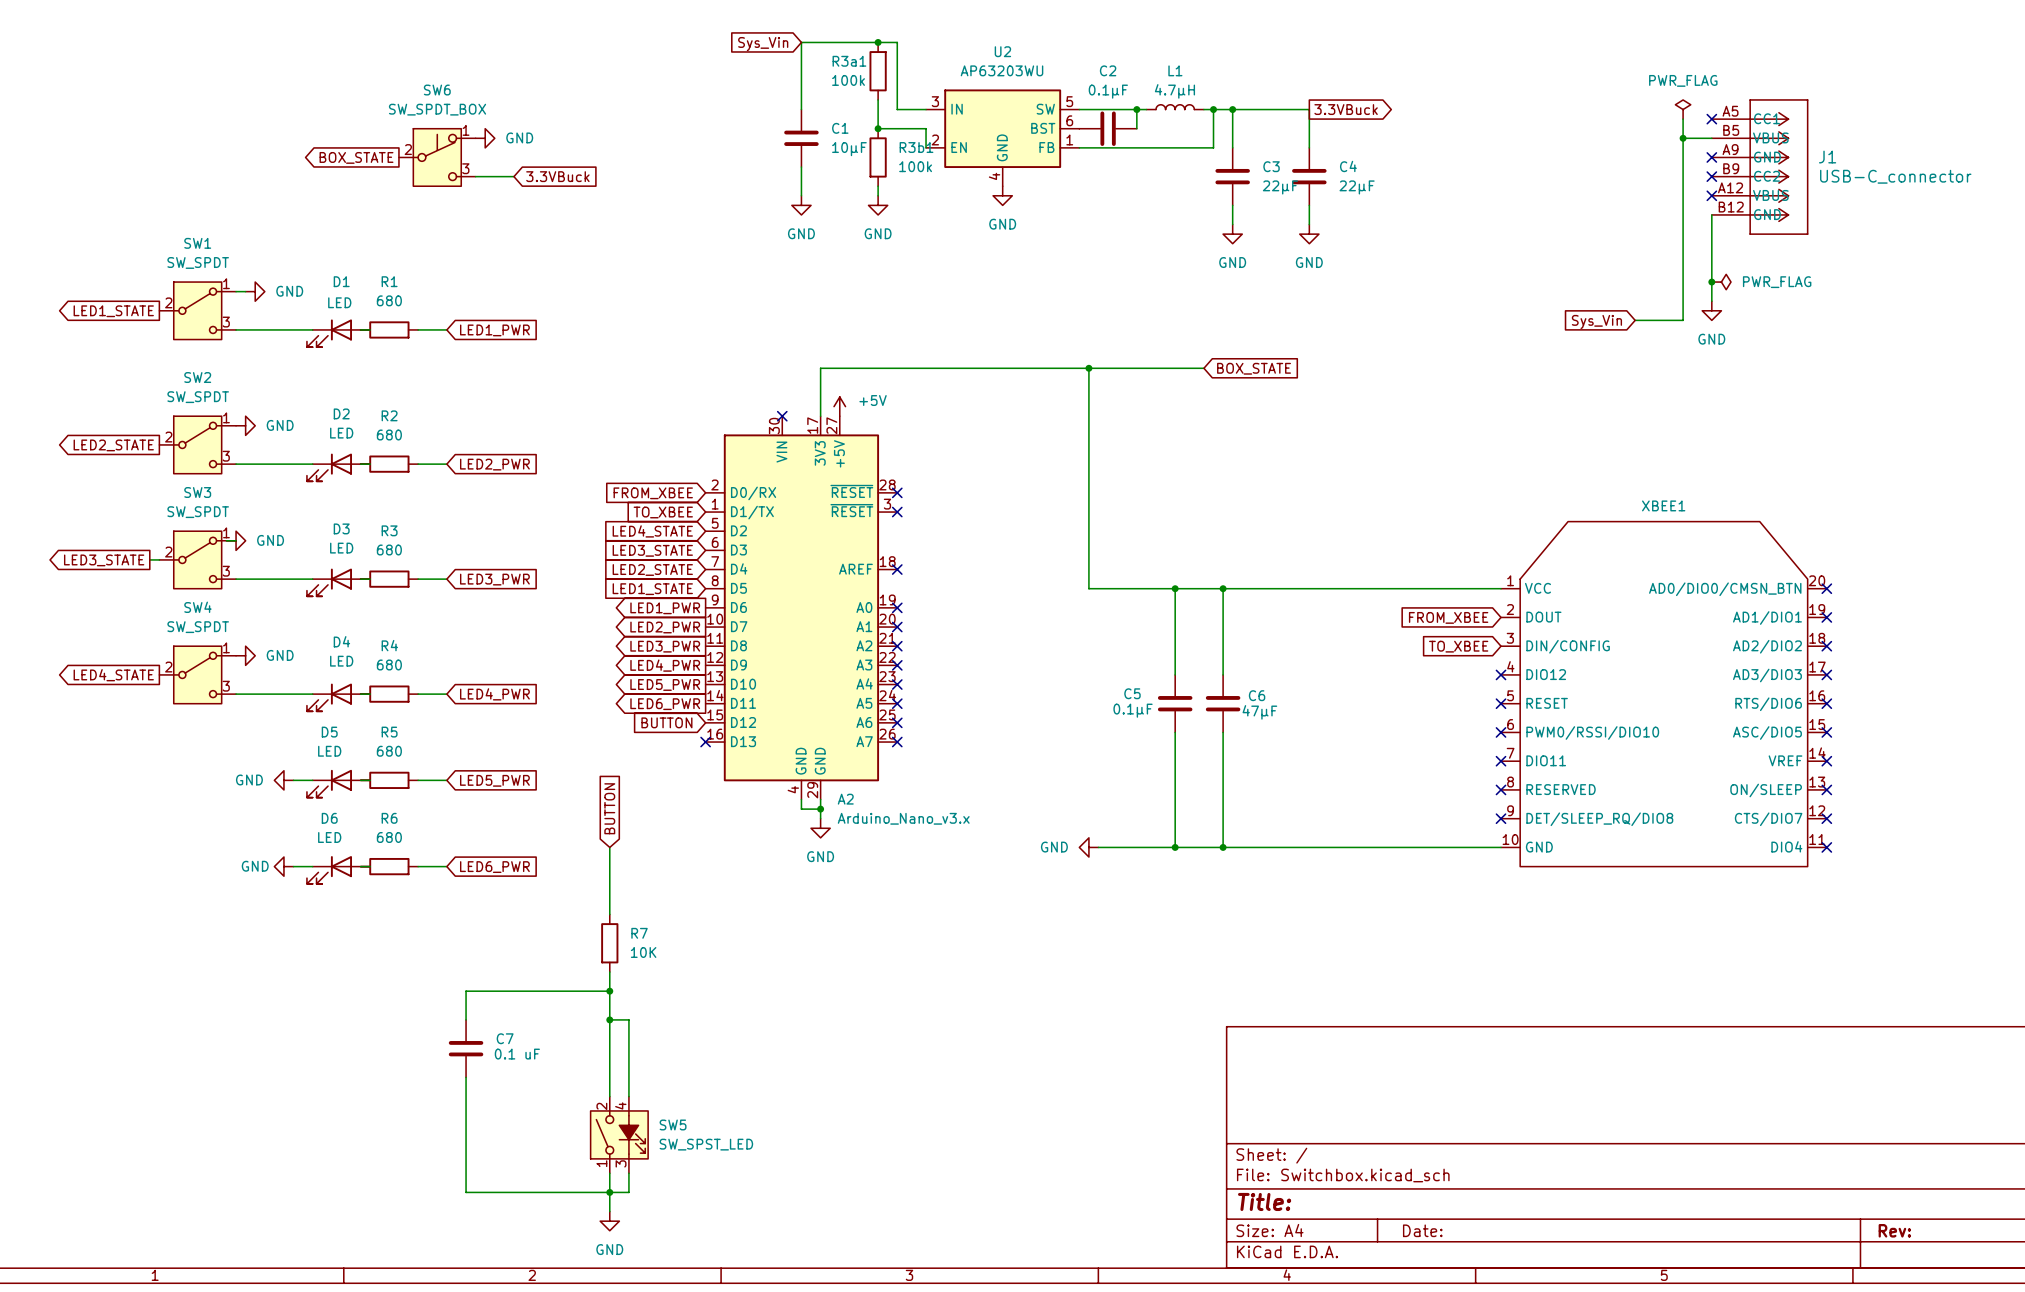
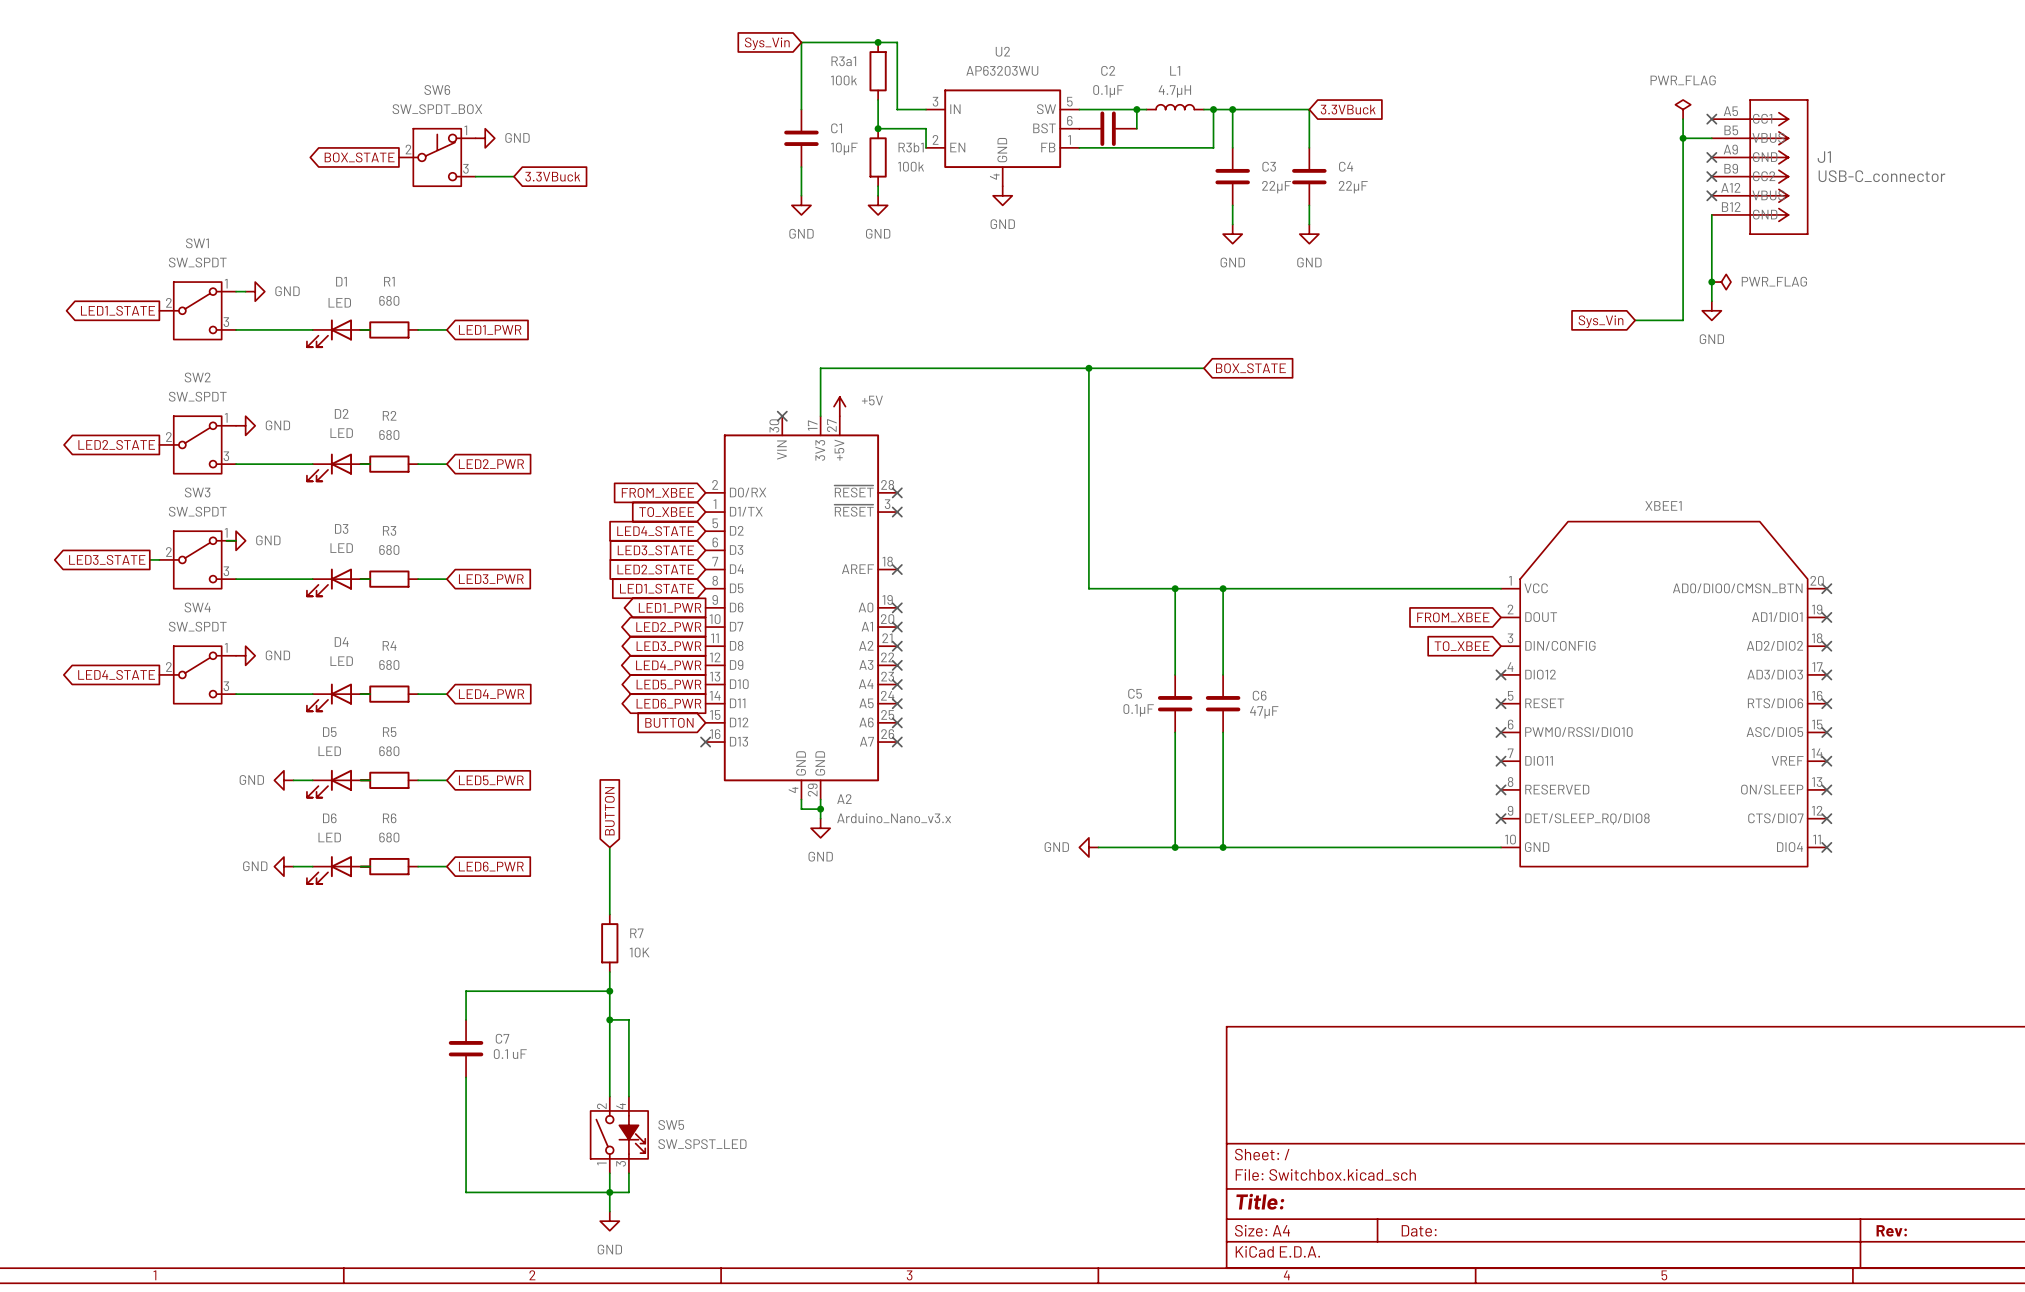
global label shape: output (1346, 109) -> input (1348, 109)

